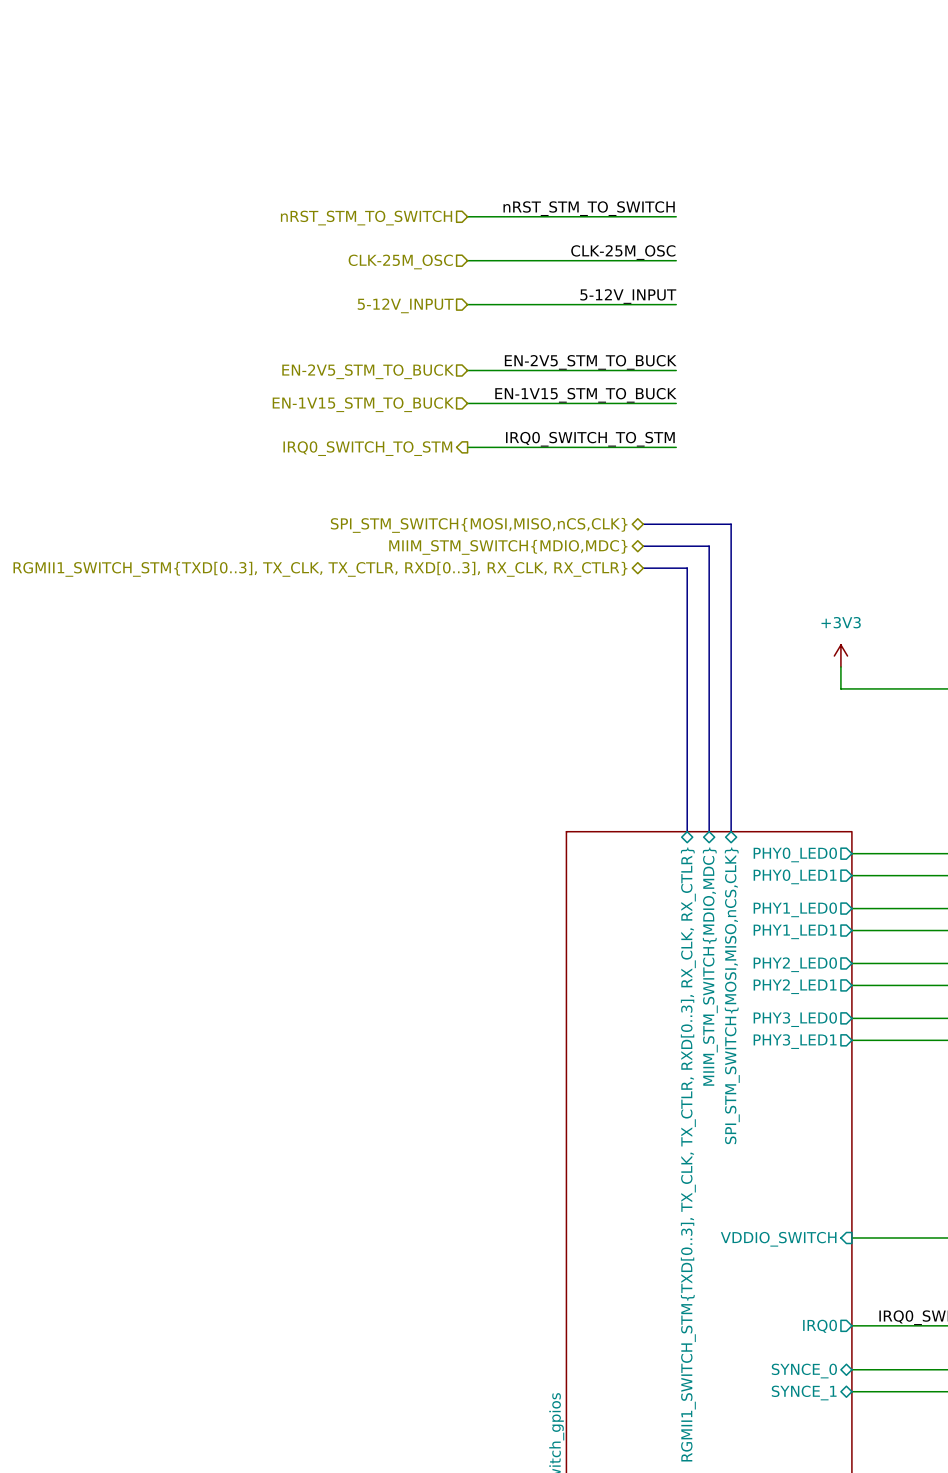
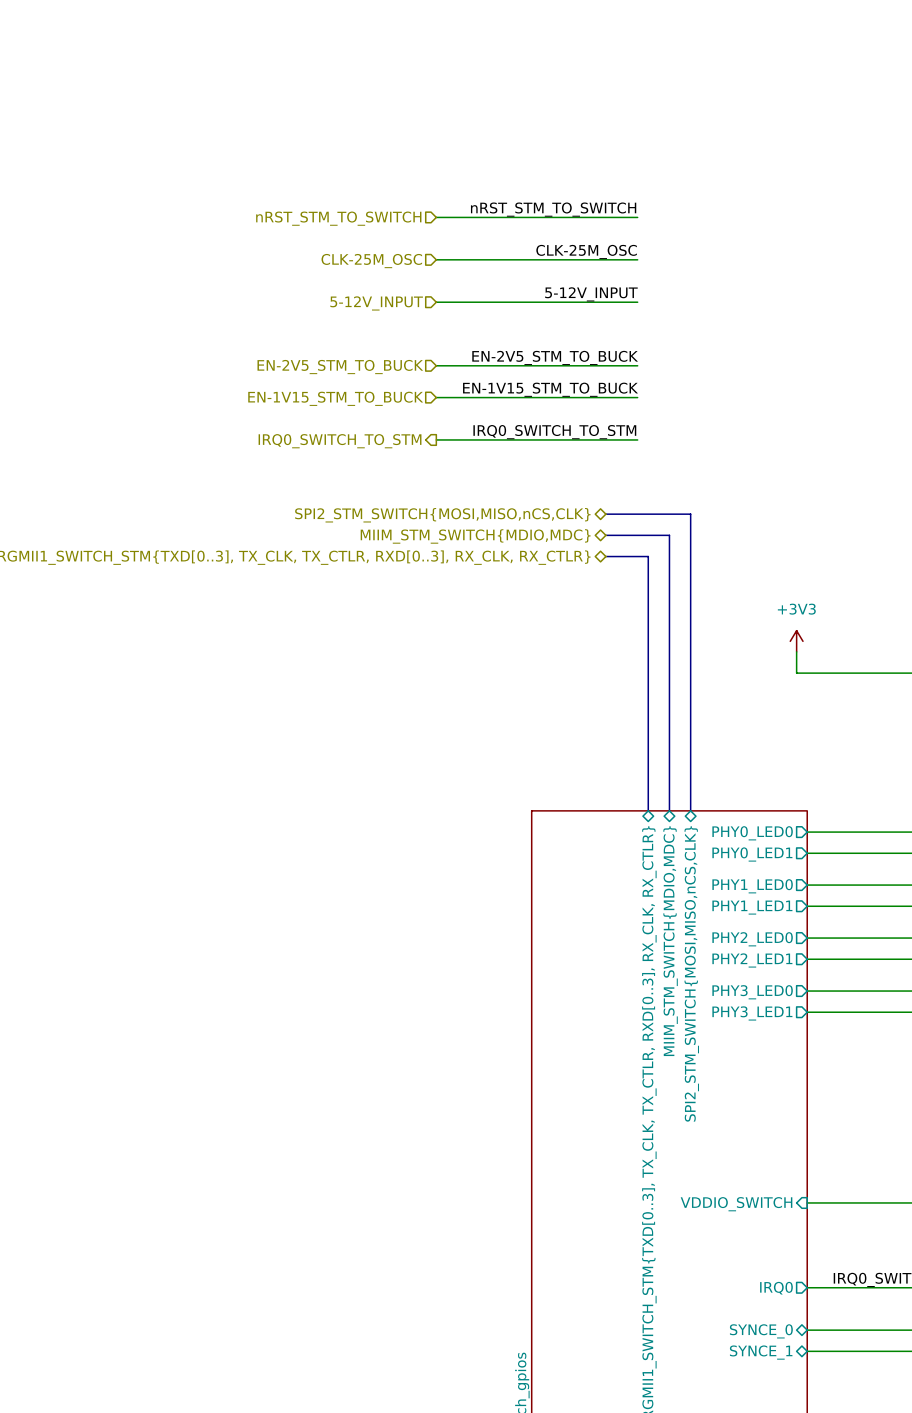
hierarchical label: SPI_STM_SWITCH{MOSI,MISO,nCS,CLK} (479, 525) -> SPI2_STM_SWITCH{MOSI,MISO,nCS,CLK} (442, 515)
sheet pin: SPI_STM_SWITCH{MOSI,MISO,nCS,CLK} (732, 995) -> SPI2_STM_SWITCH{MOSI,MISO,nCS,CLK} (691, 973)

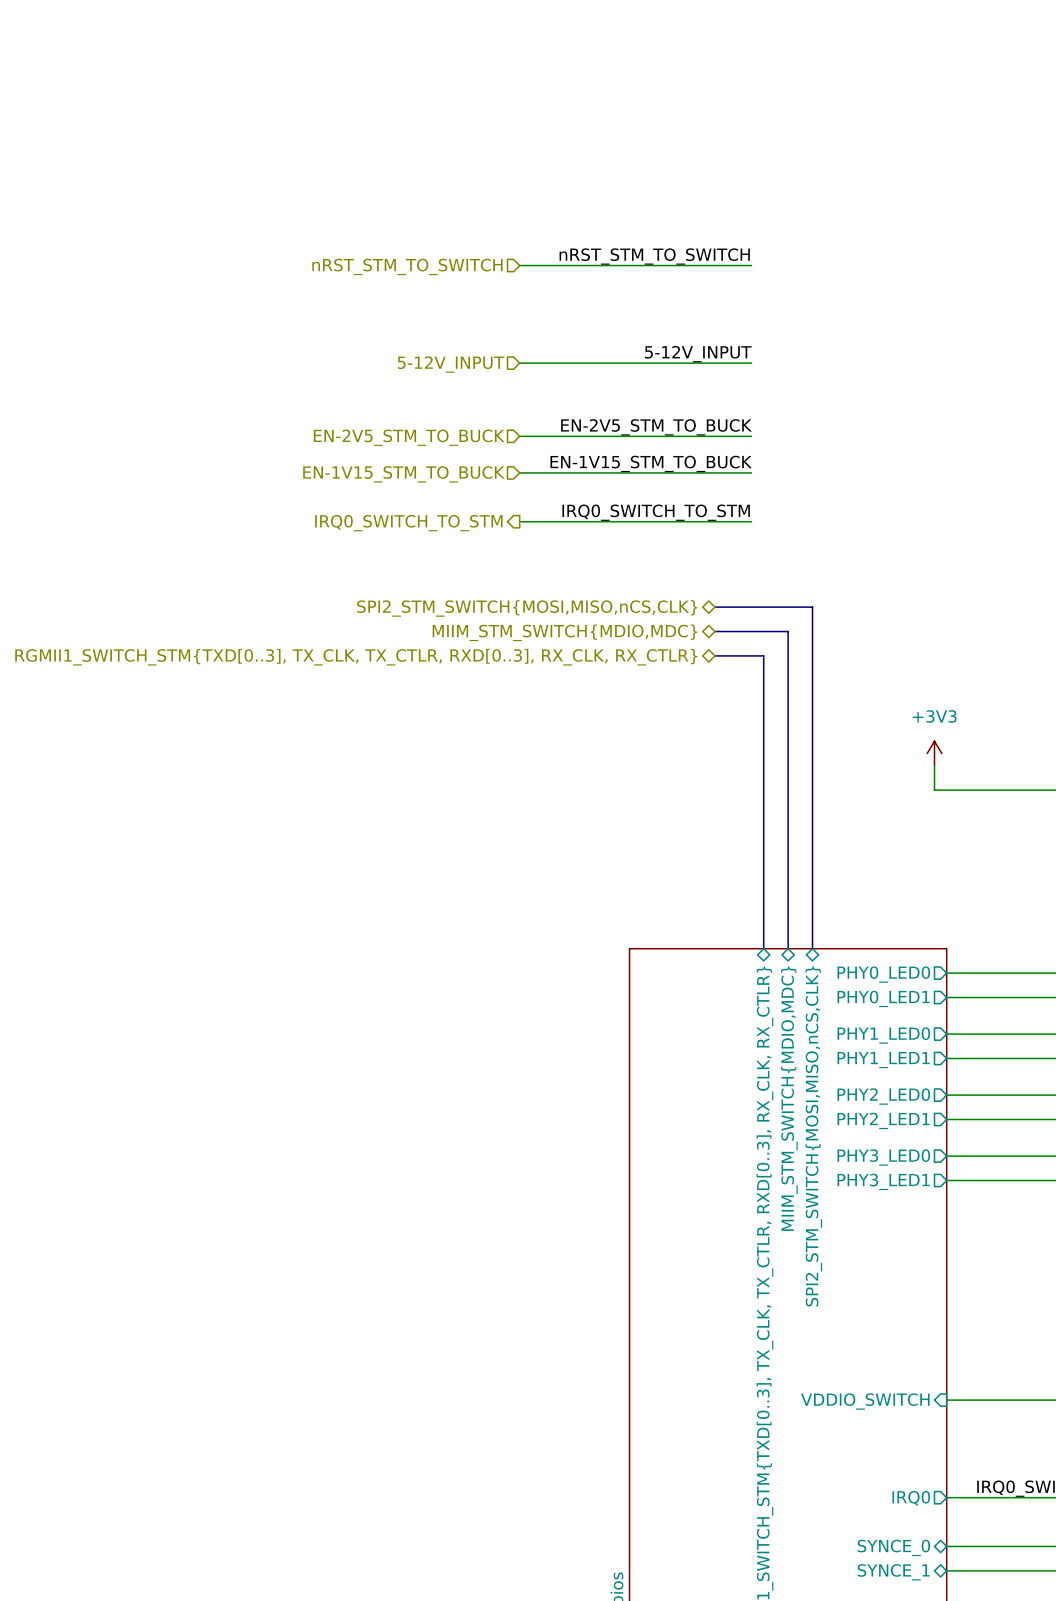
label: CLK-25M_OSC (586, 251) -> none
wire: (436, 259) (637, 259) -> none
hierarchical label: CLK-25M_OSC (371, 261) -> none

